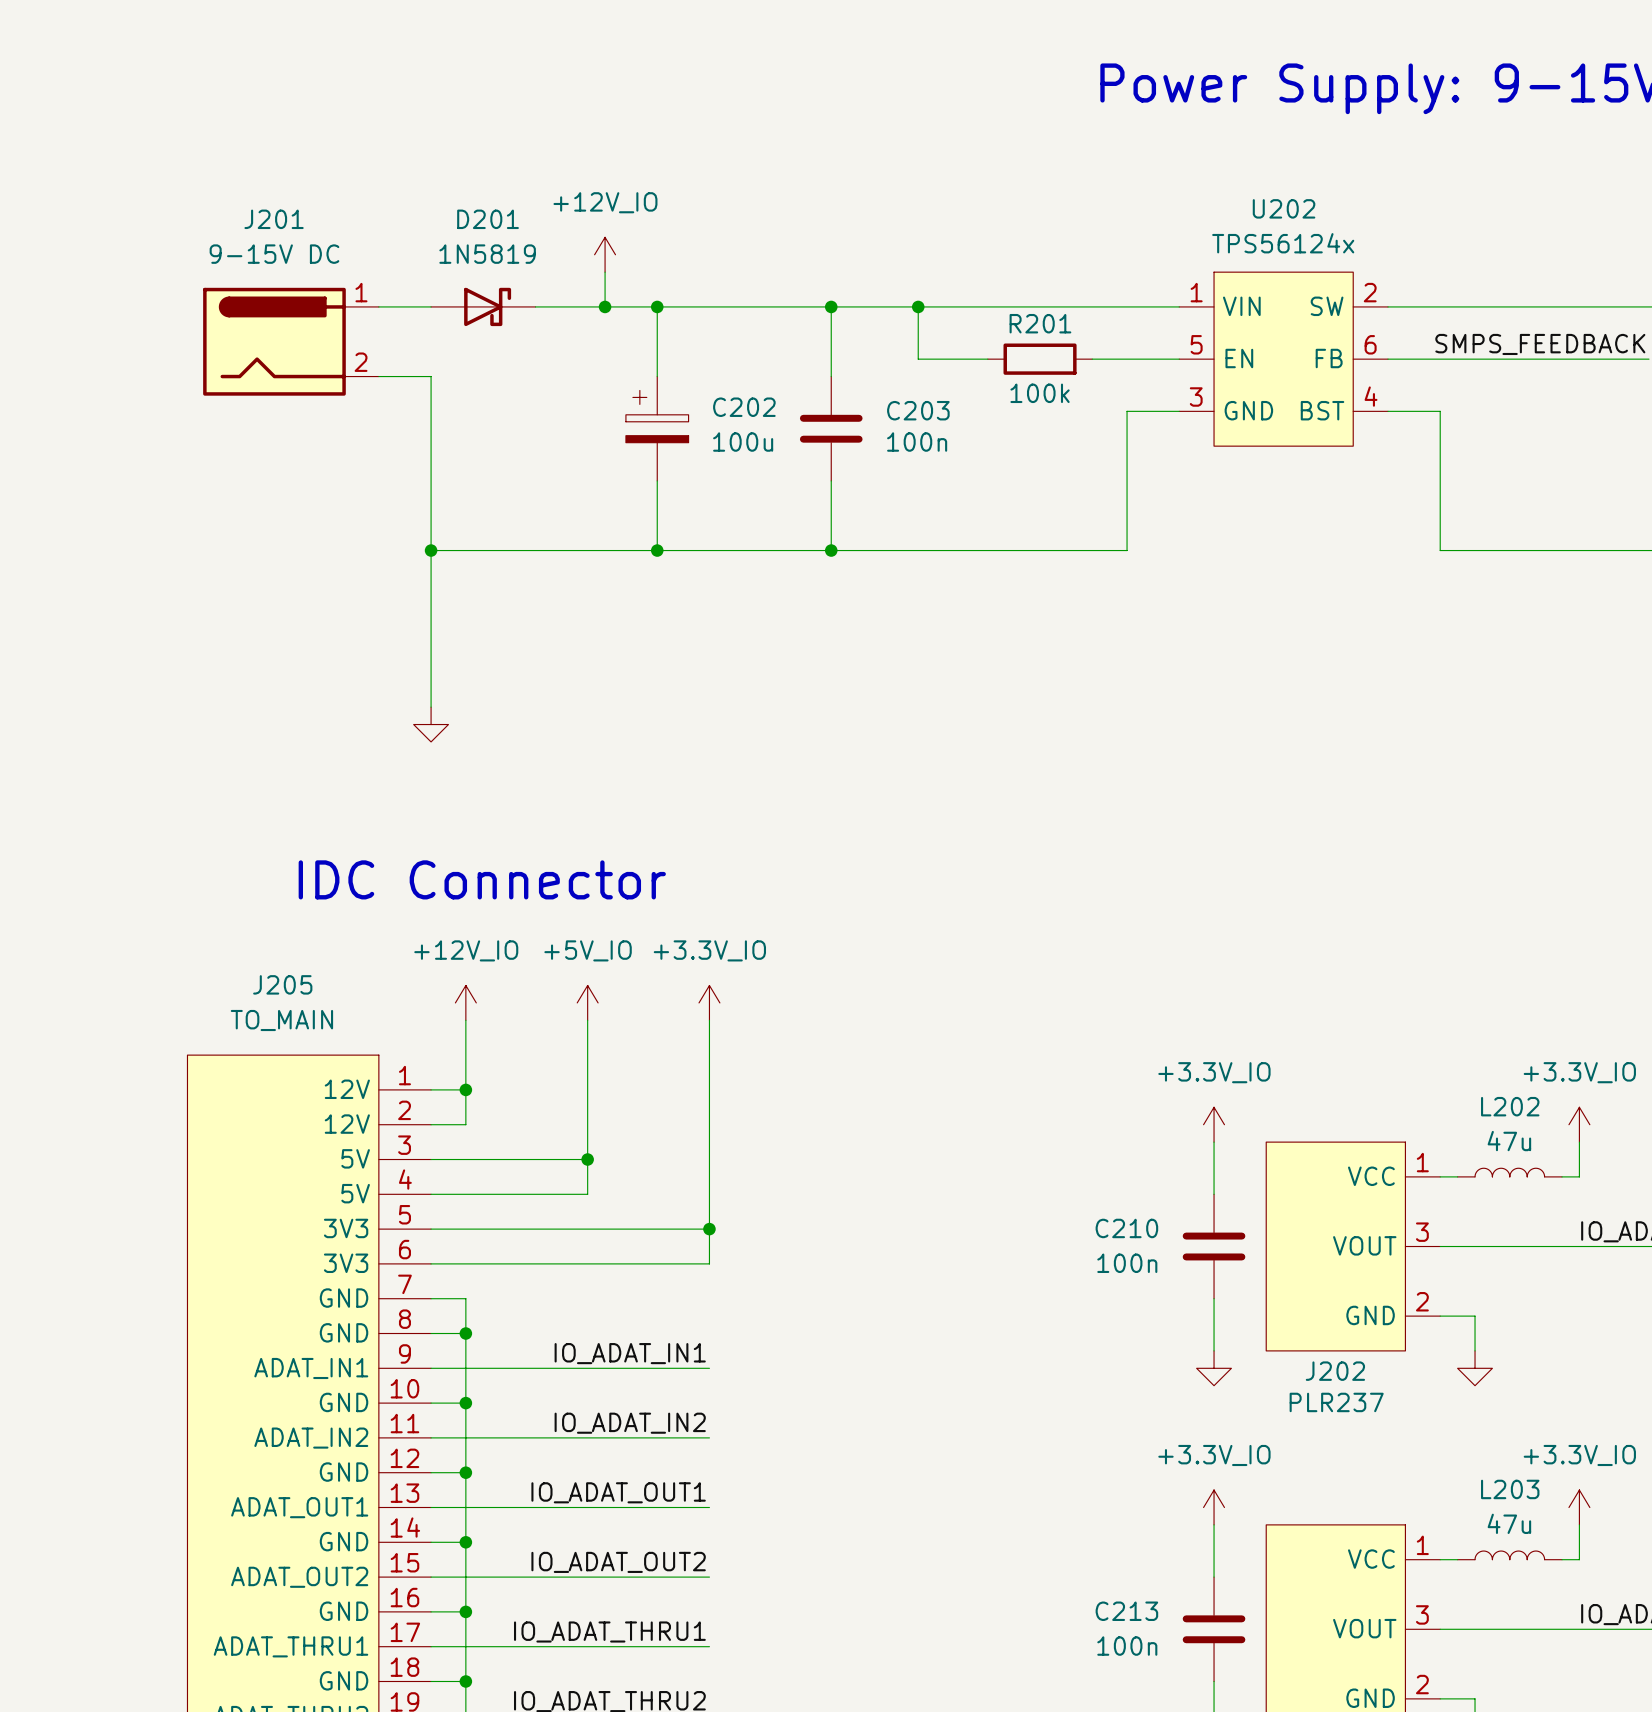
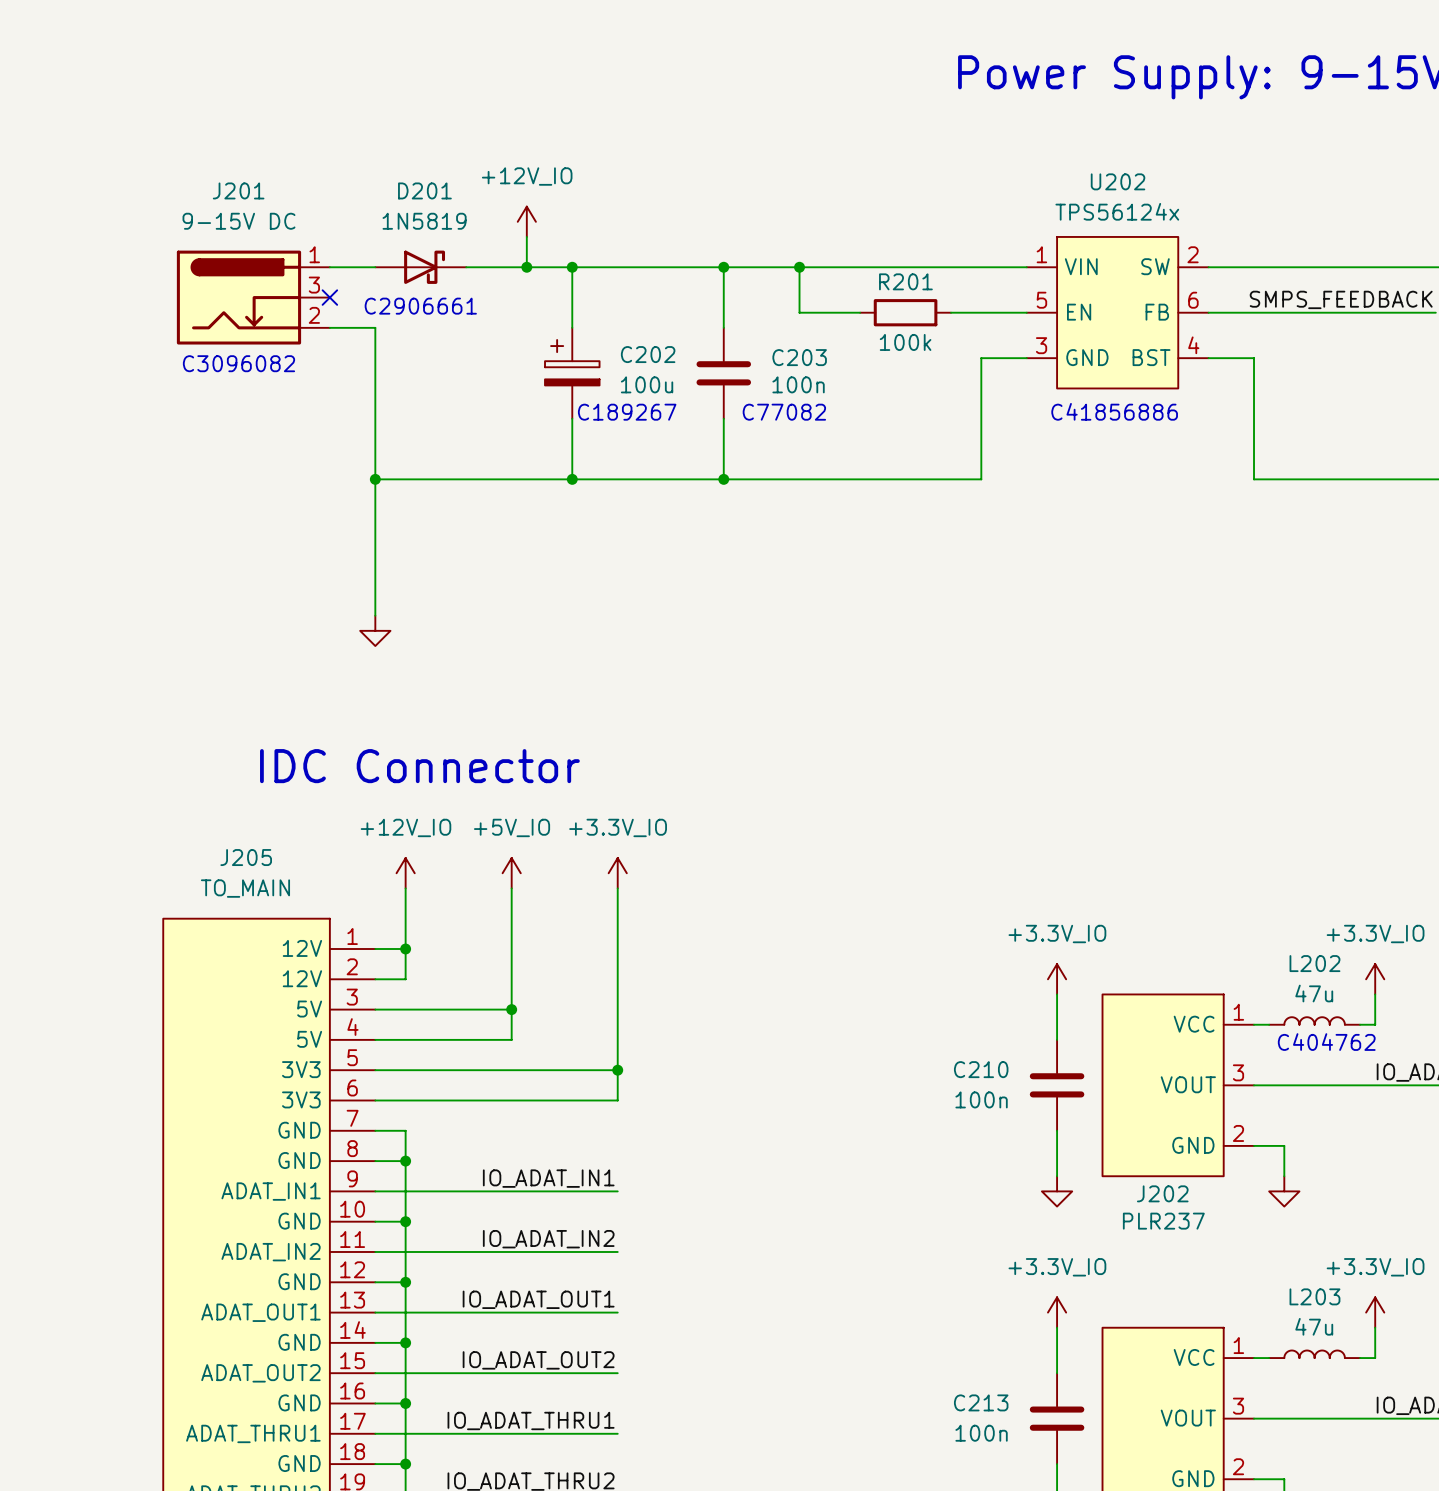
J201 symbol: [203, 287, 379, 396] -> [176, 250, 330, 345]
no-connect mark: none -> (329, 297)
text: none -> C2906661 (420, 306)
text: none -> C3096082 (238, 363)
text: none -> C41856886 (1114, 411)
text: none -> C189267 (627, 412)
text: none -> C77082 (784, 412)
text: none -> C404762 (1326, 1042)

